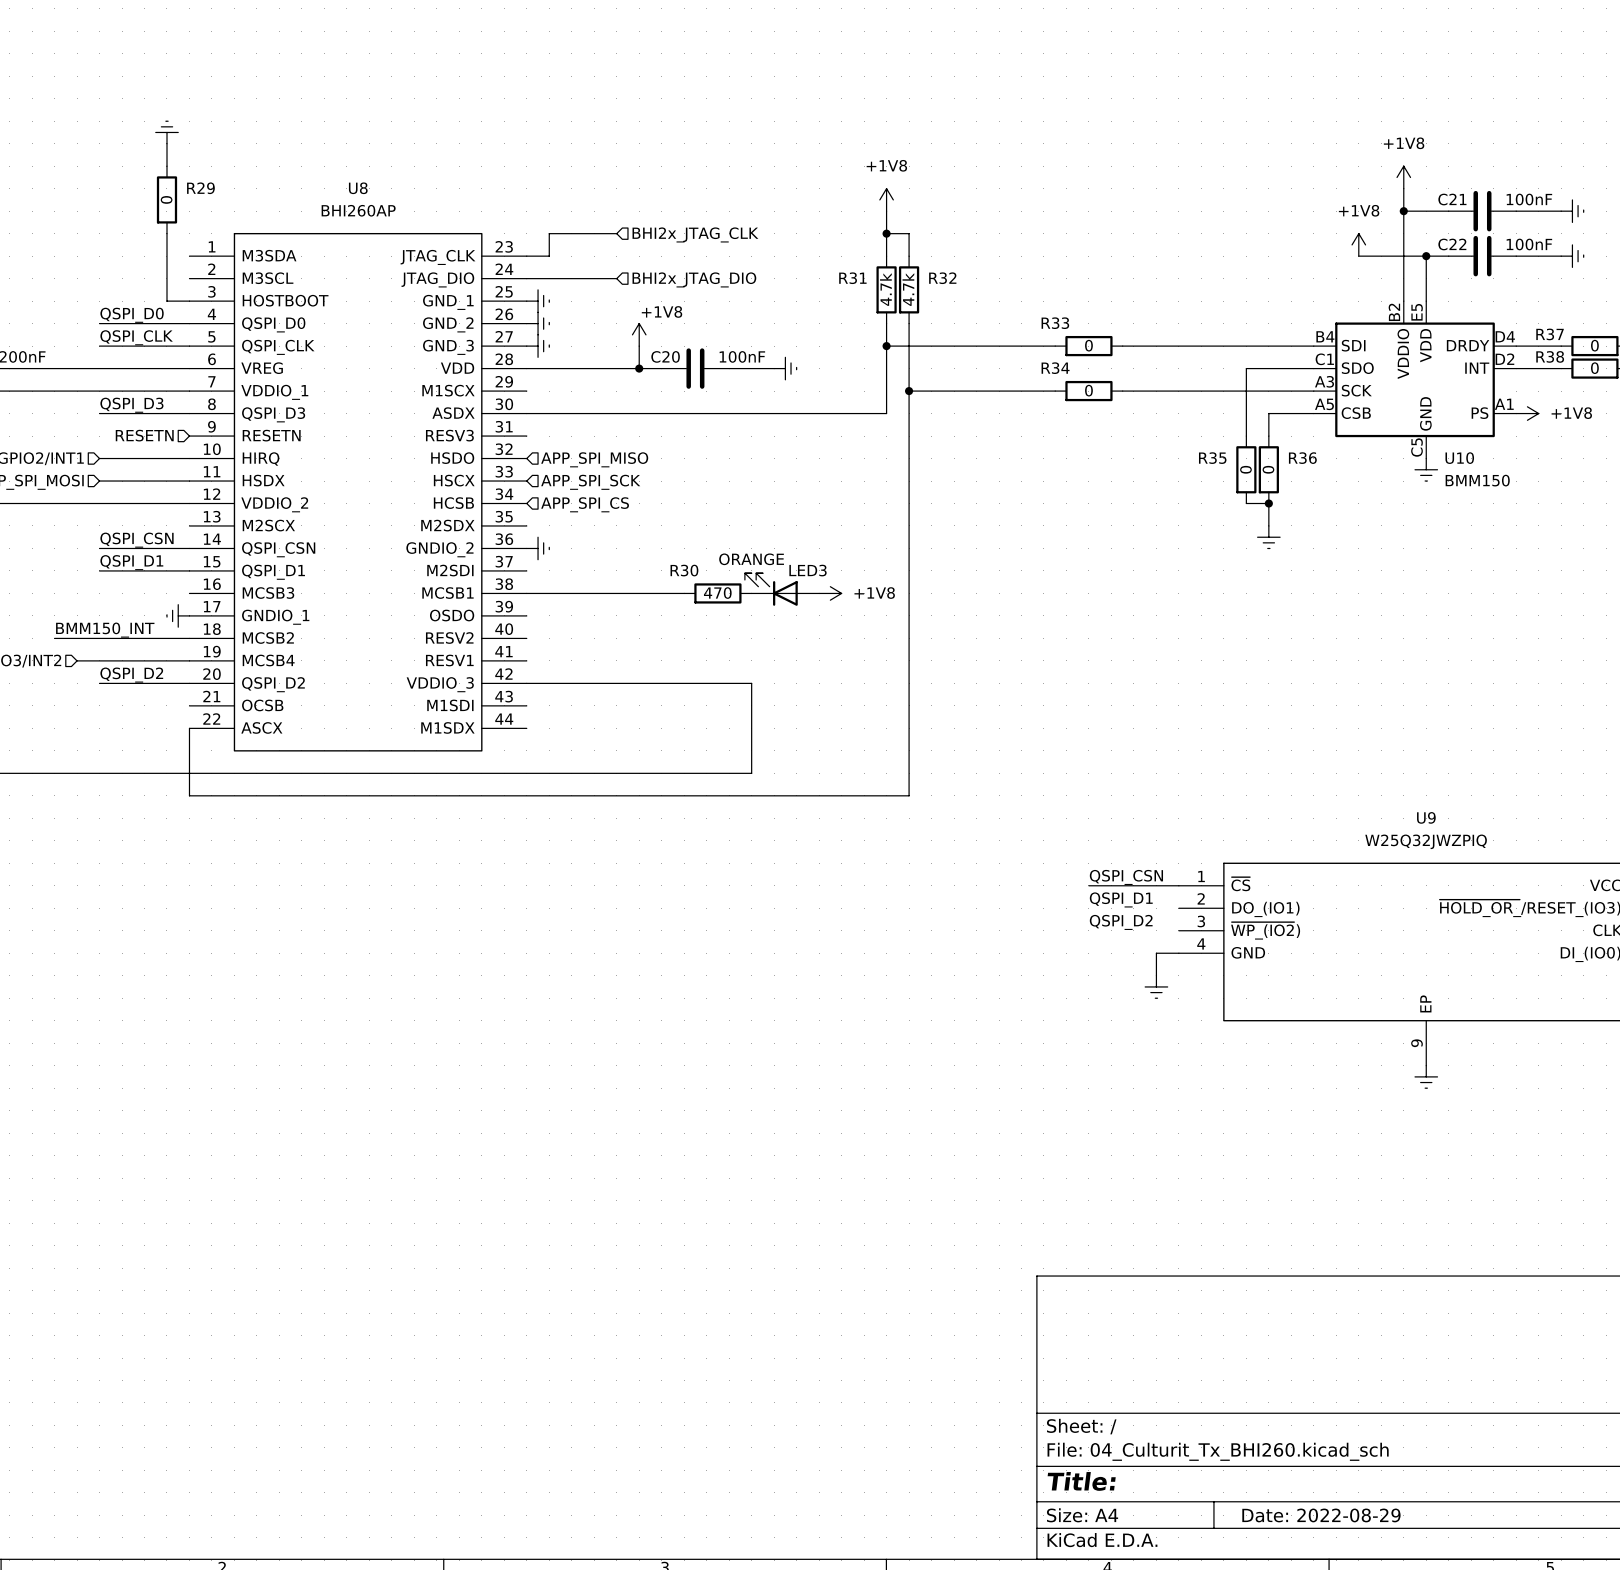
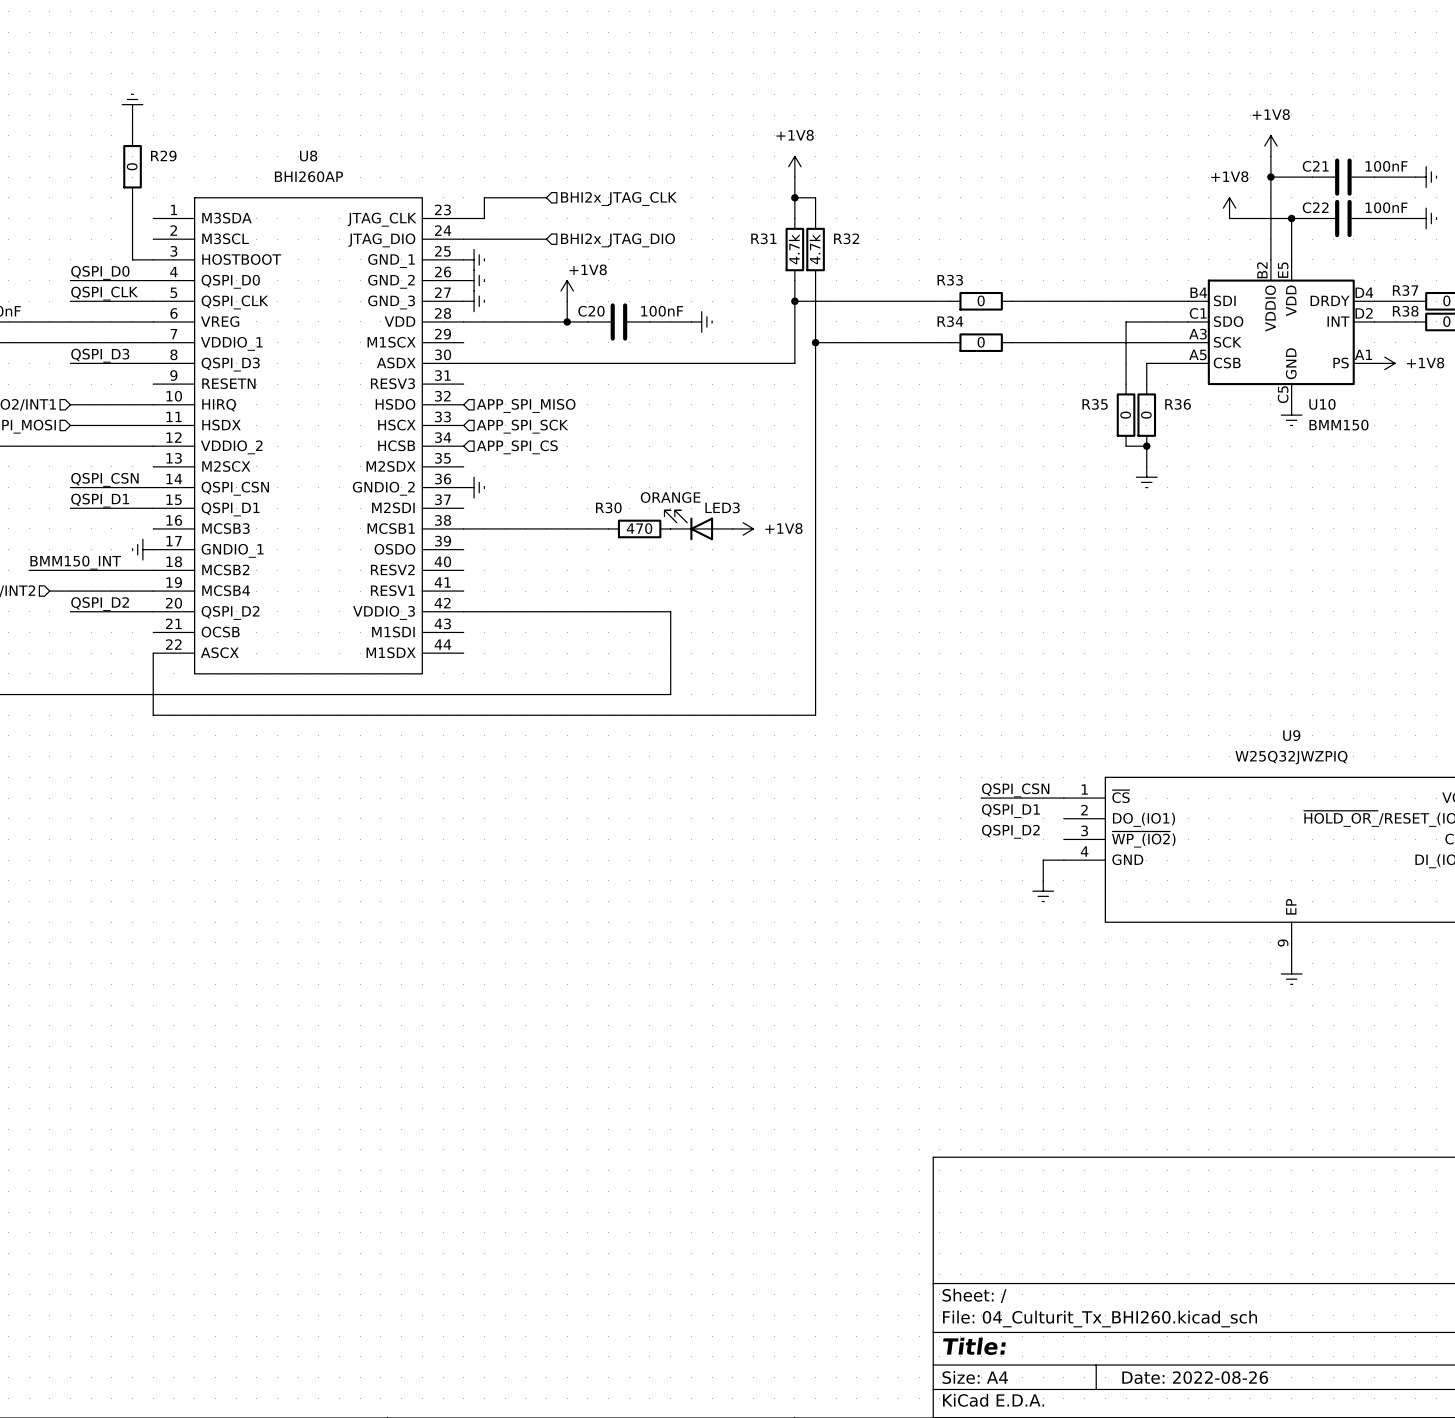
hierarchical label: RESETN (144, 435) -> none
title block: Date: 2022-08-29 (1321, 1515) -> Date: 2022-08-26 (1195, 1377)

